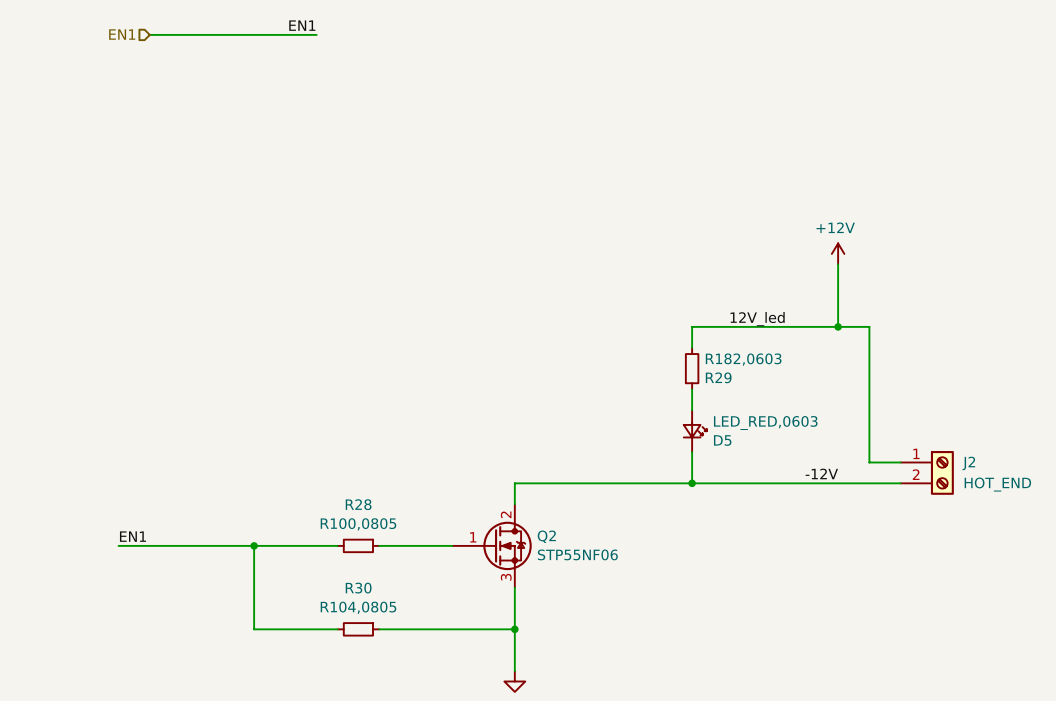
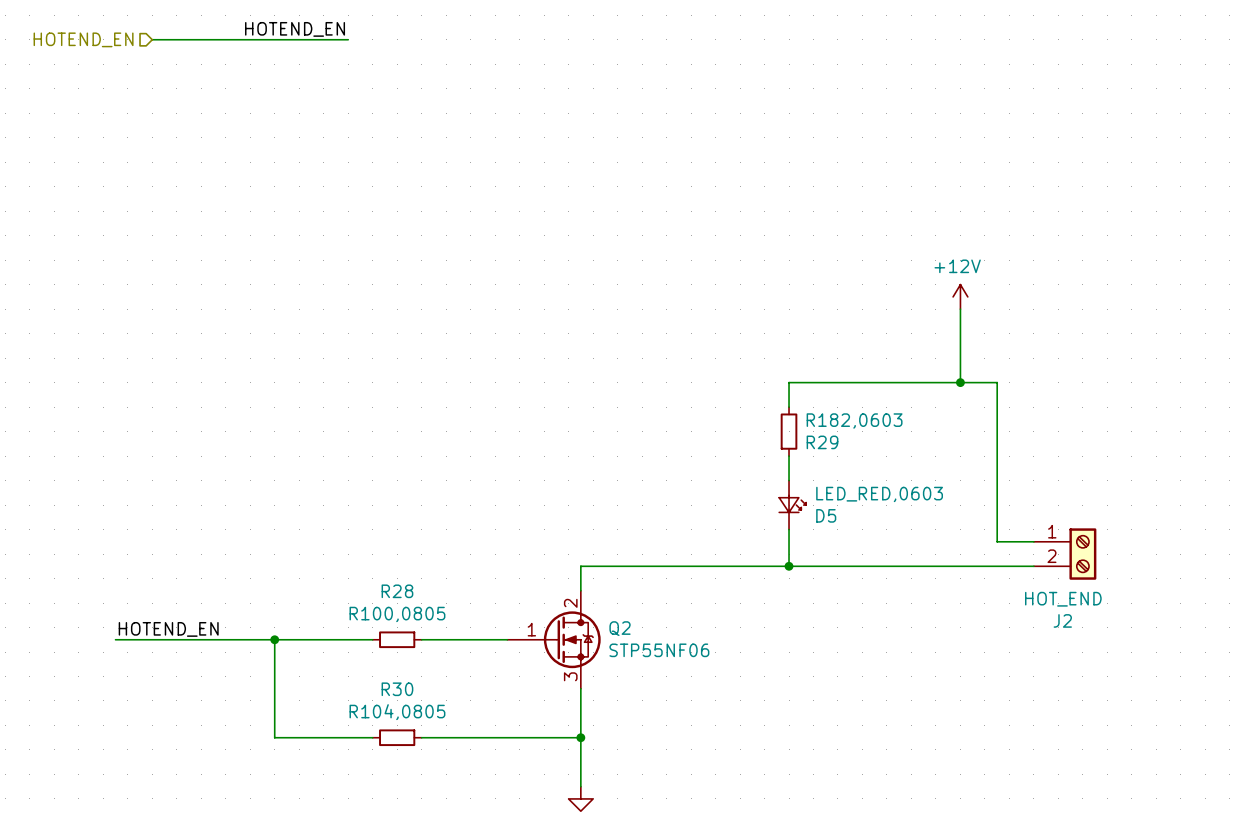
label: EN1 (302, 25) -> HOTEND_EN (295, 29)
hierarchical label: EN1 (122, 34) -> HOTEND_EN (83, 39)
label: 12V_led (757, 319) -> none
J2 name position: J2 (968, 463) -> J2 (1062, 620)
label: -12V (821, 473) -> none
J2 value position: HOT_END (997, 484) -> HOT_END (1063, 599)
label: EN1 (133, 536) -> HOTEND_EN (168, 629)

